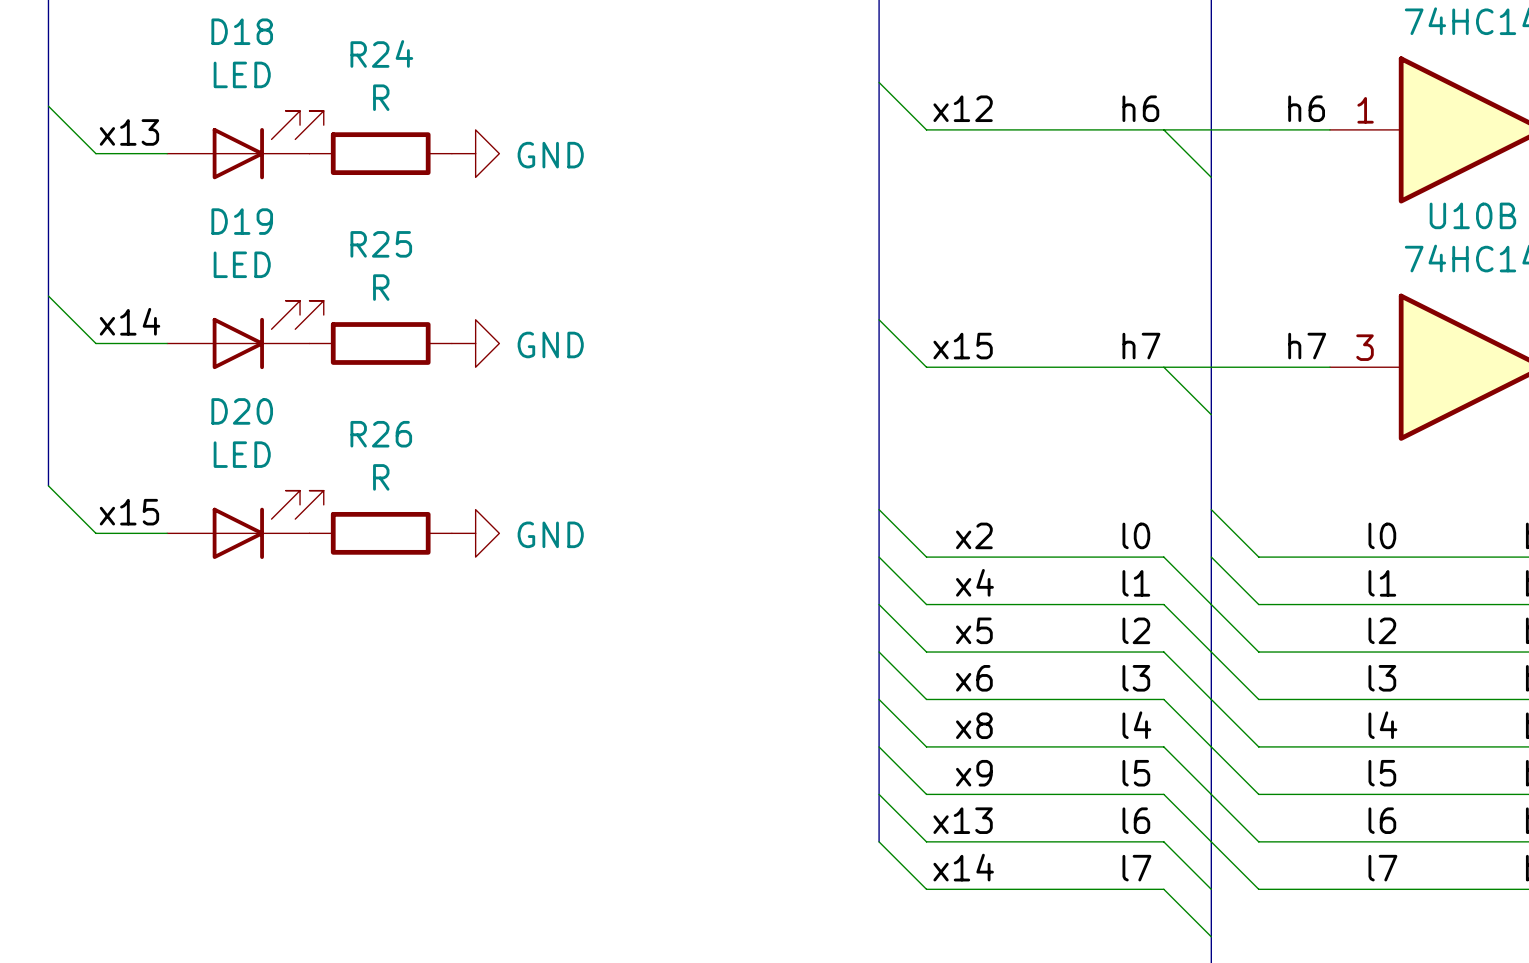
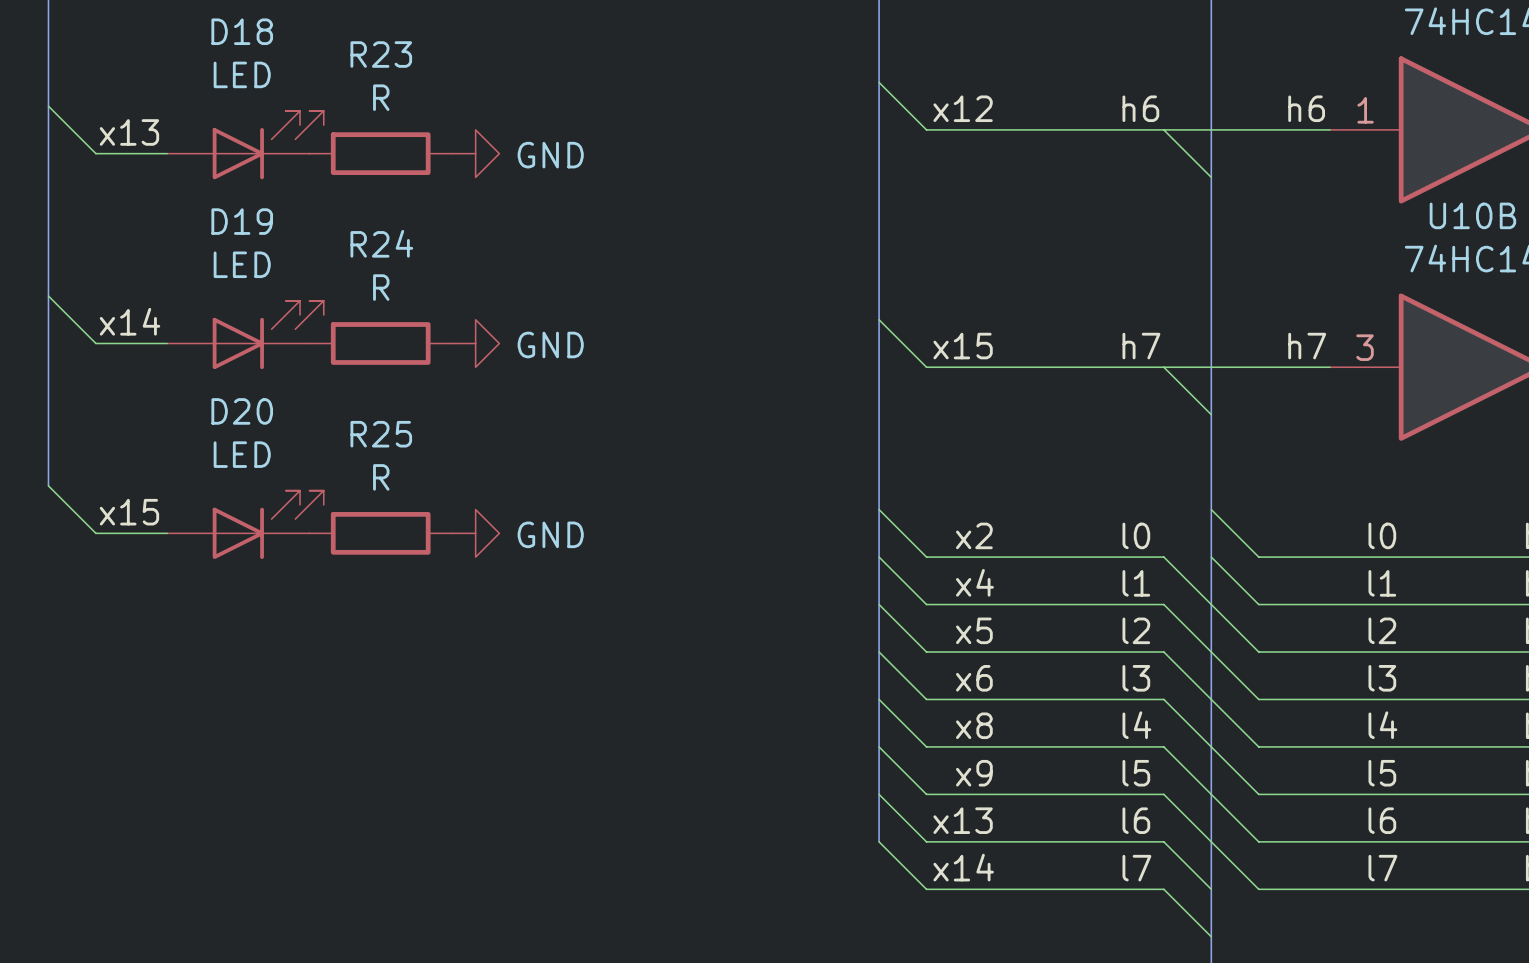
R24 name: R24 (381, 53) -> R23 (381, 54)
R25 name: R25 (381, 244) -> R24 (381, 243)
R26 name: R26 (381, 434) -> R25 (381, 434)

